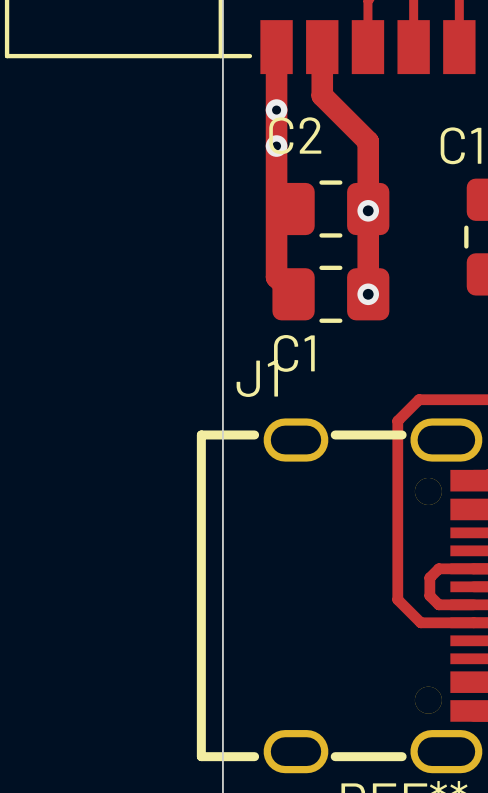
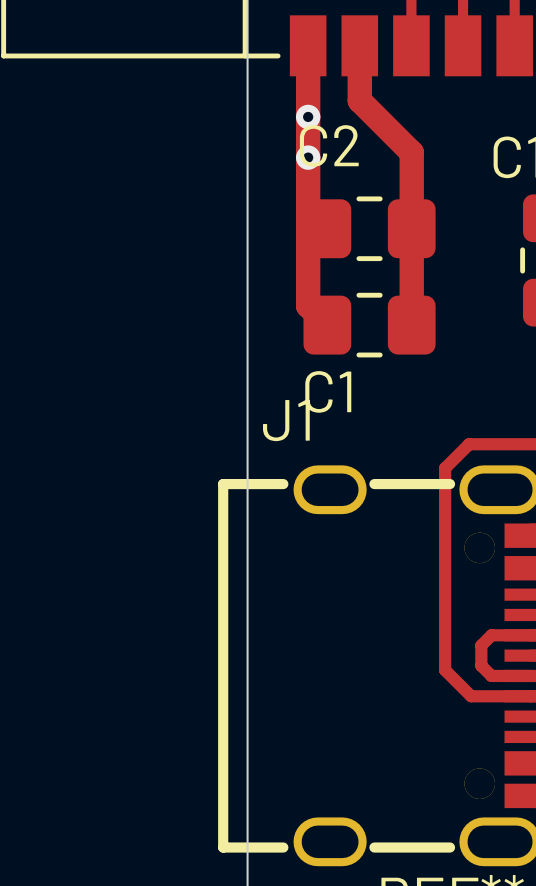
via: (368, 210) -> none
via: (368, 294) -> none

